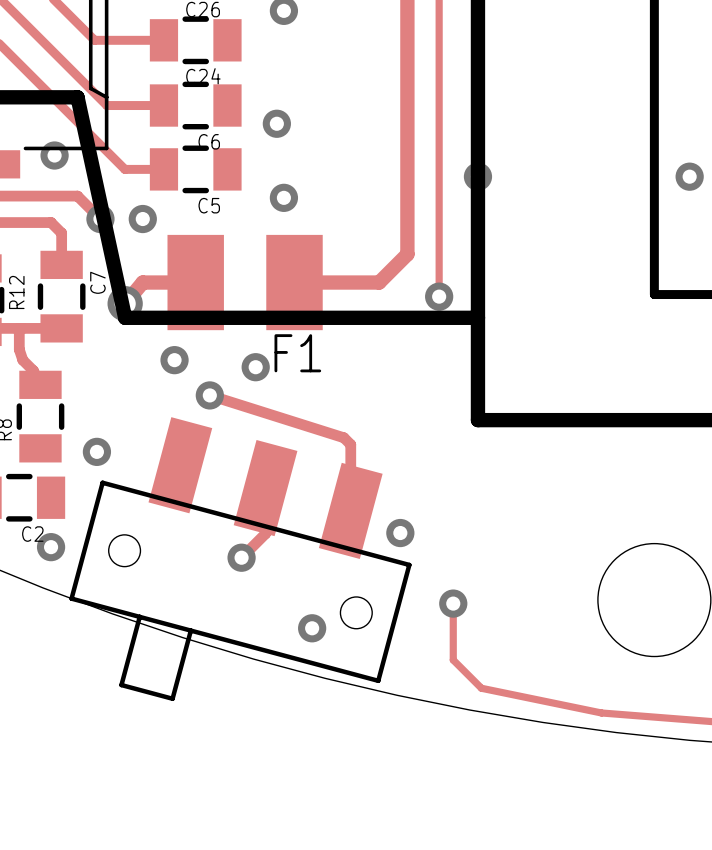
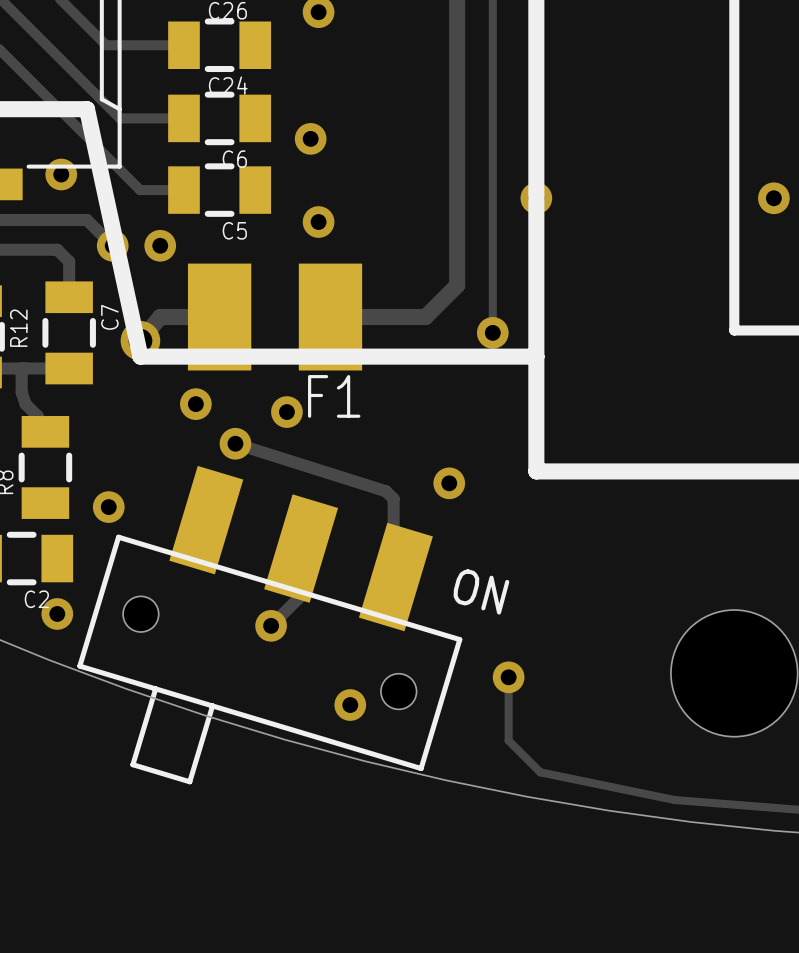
text: none -> ON (481, 591)
via position: (400, 533) -> (449, 483)
part rotation: 0° (240, 559) -> 1.7° clockwise (269, 625)

